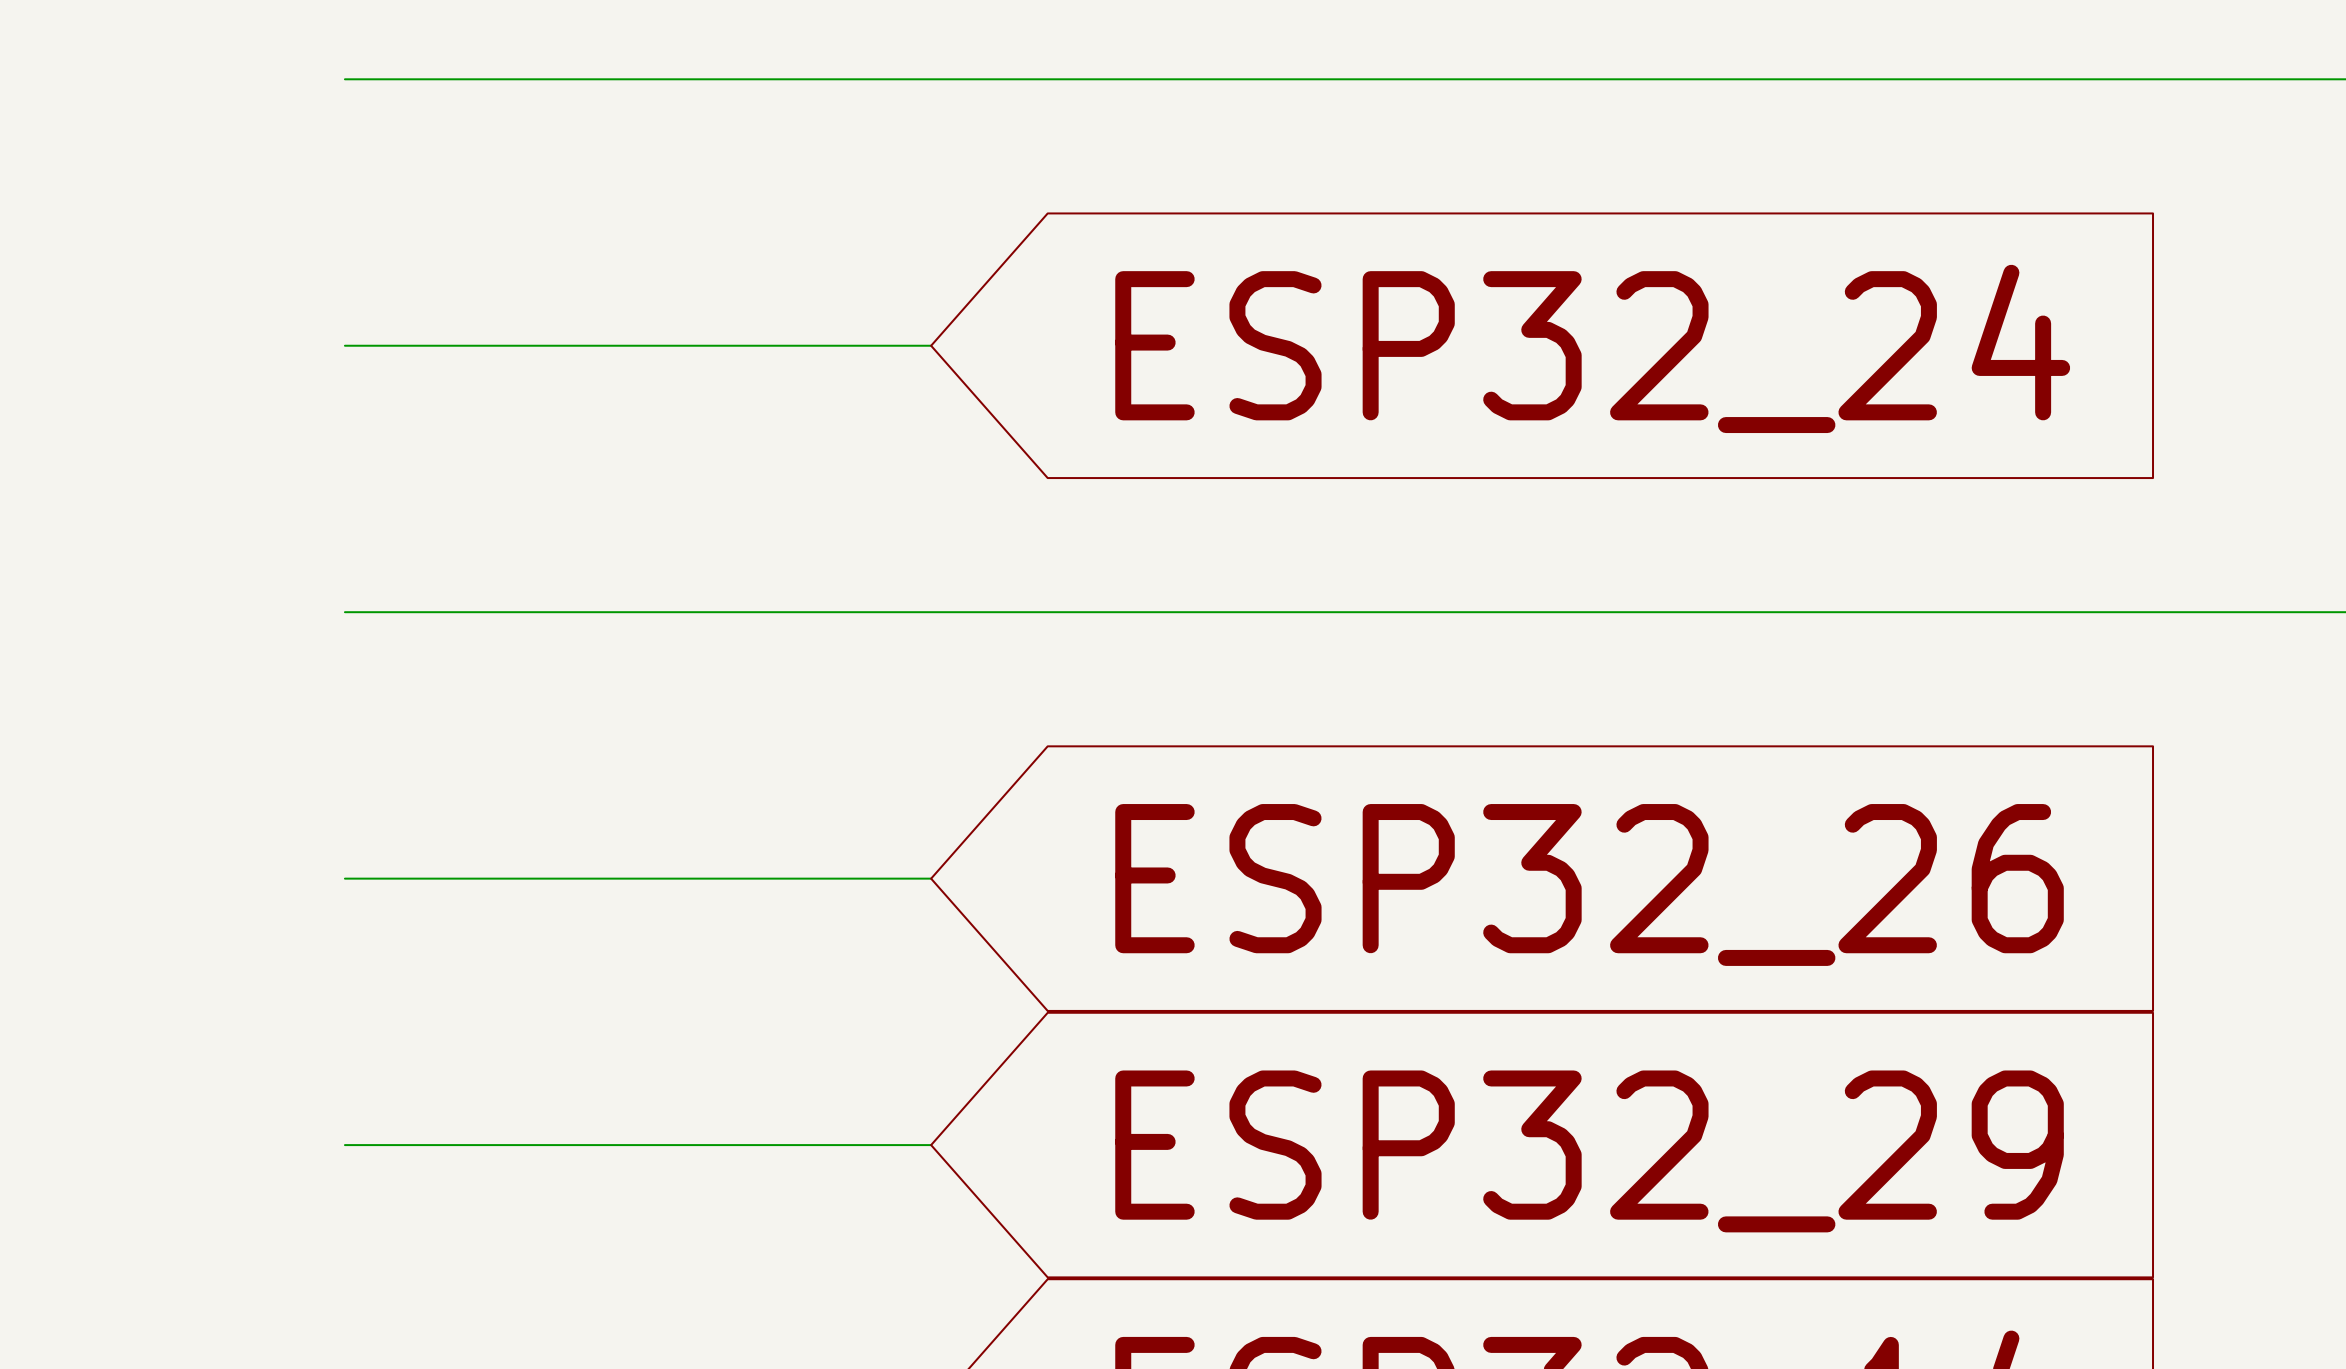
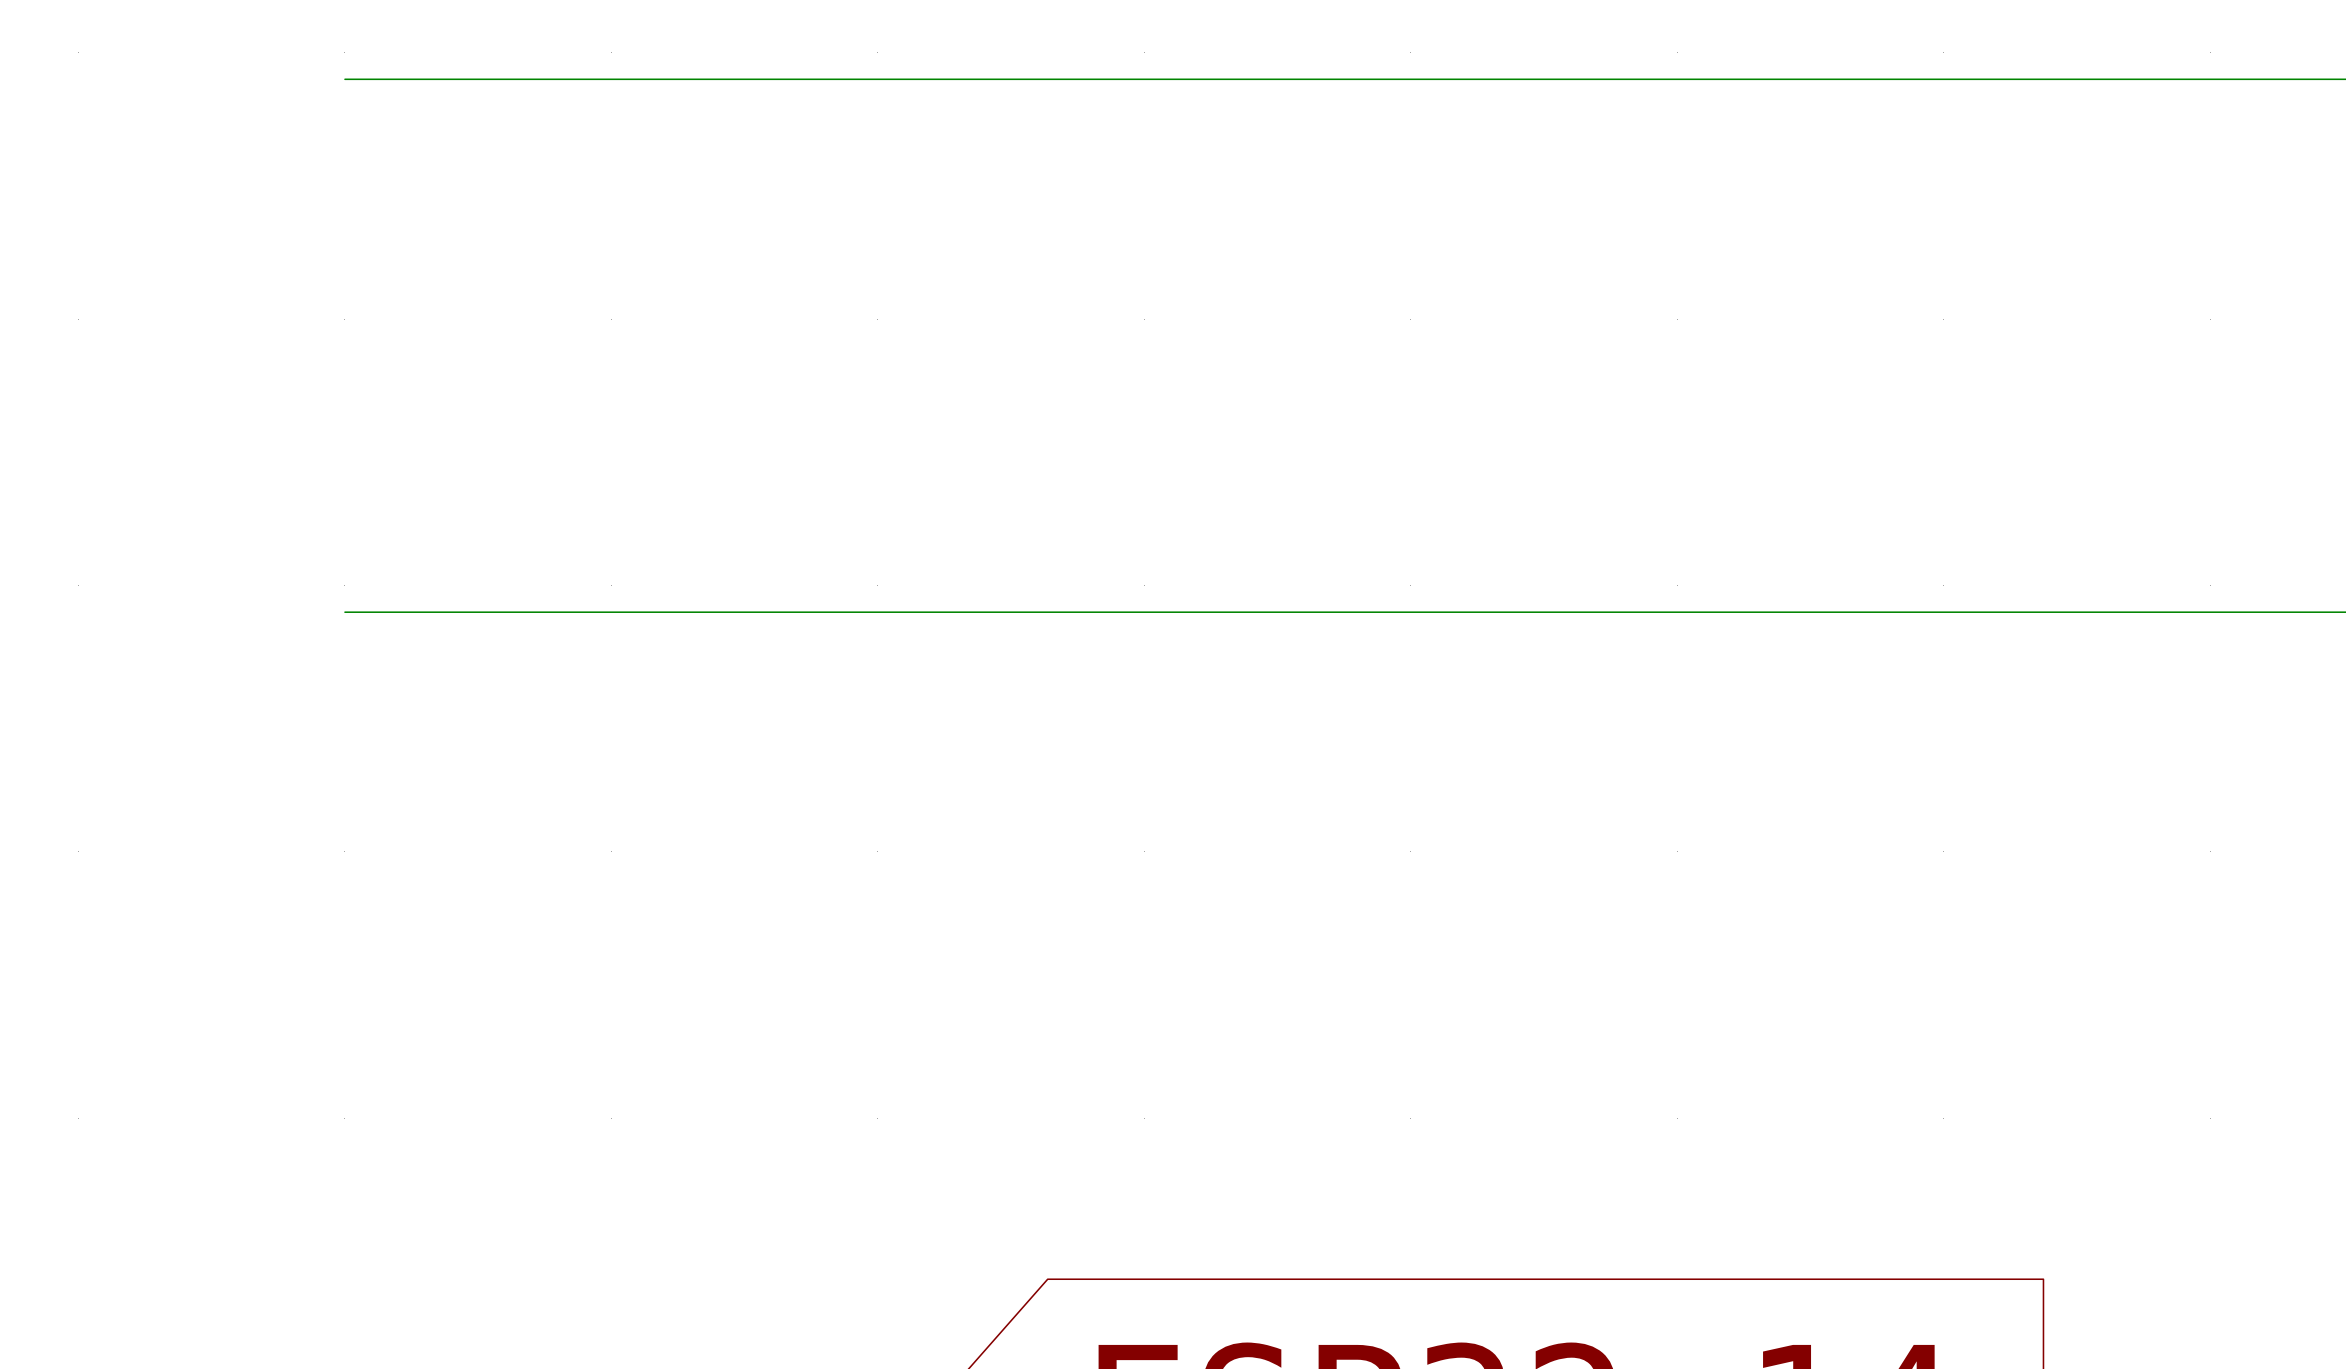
wire: (344, 345) (931, 345) -> none
global label: ESP32_24 (1592, 348) -> none
wire: (344, 878) (931, 878) -> none
global label: ESP32_26 (1589, 884) -> none
wire: (344, 1145) (931, 1145) -> none
global label: ESP32_29 (1589, 1151) -> none

